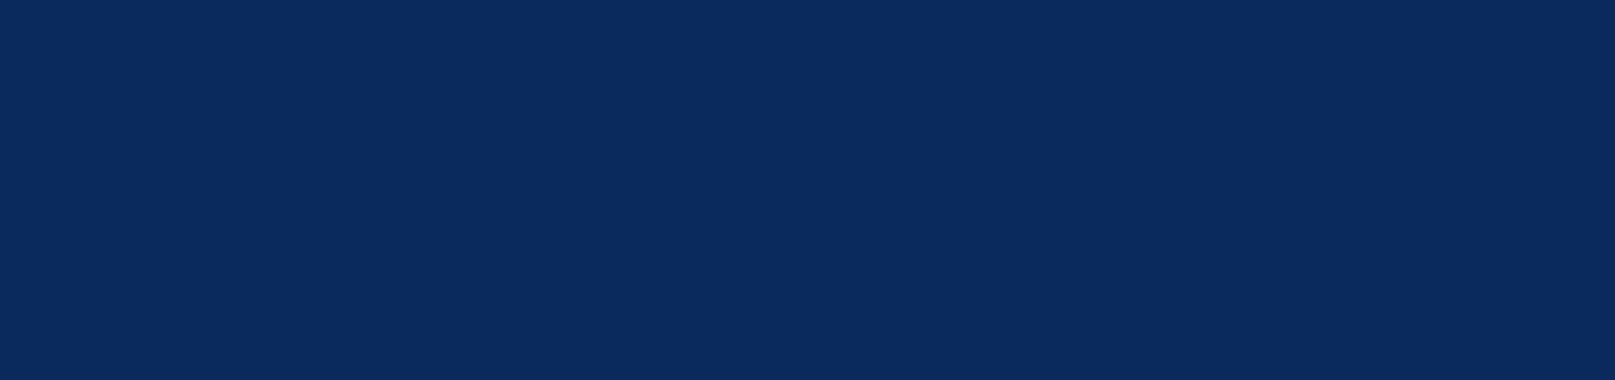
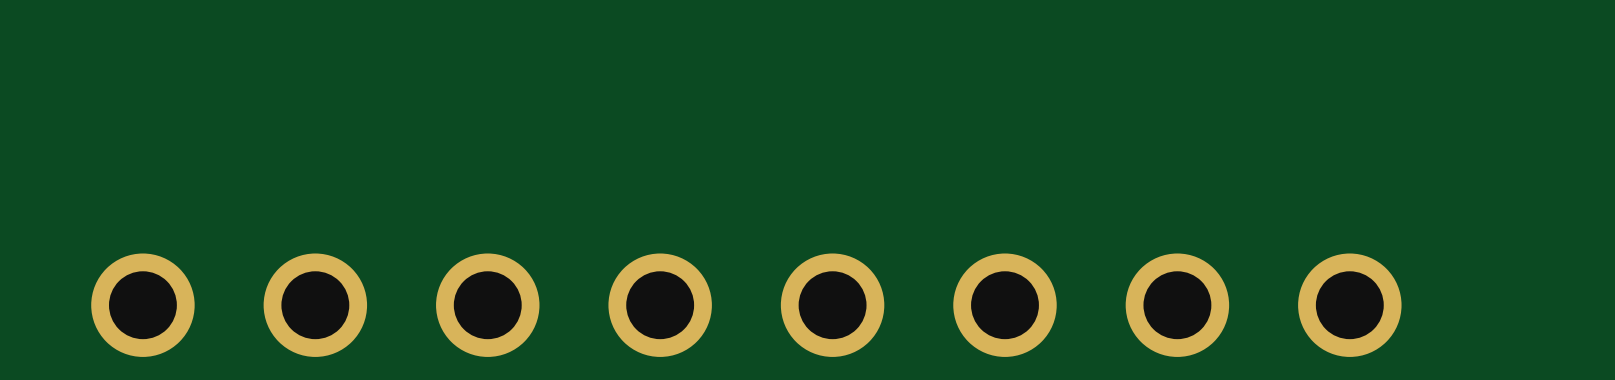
part: none -> (746, 305)

